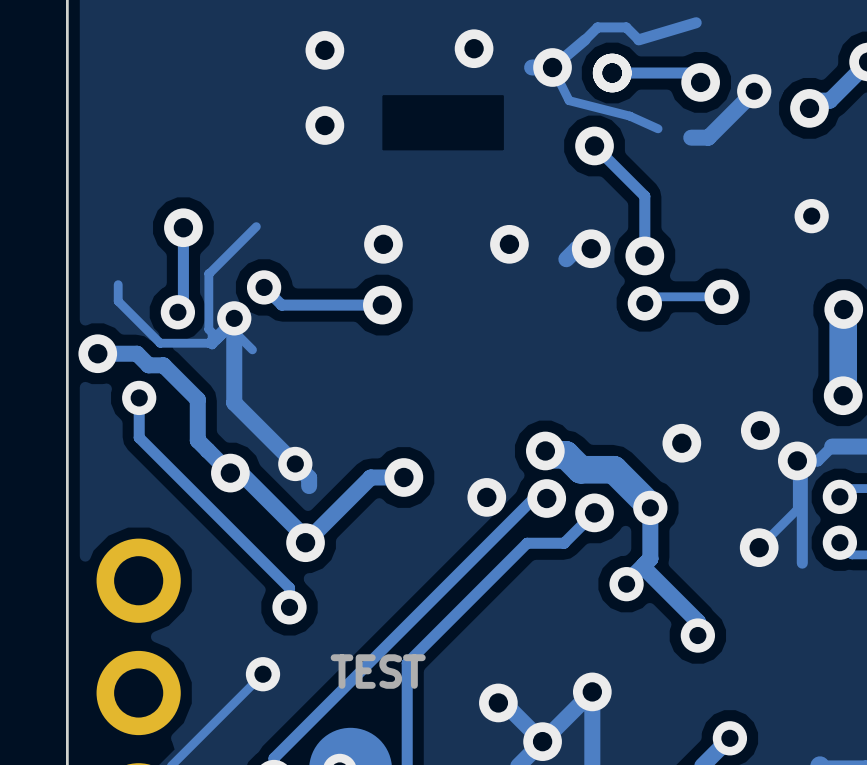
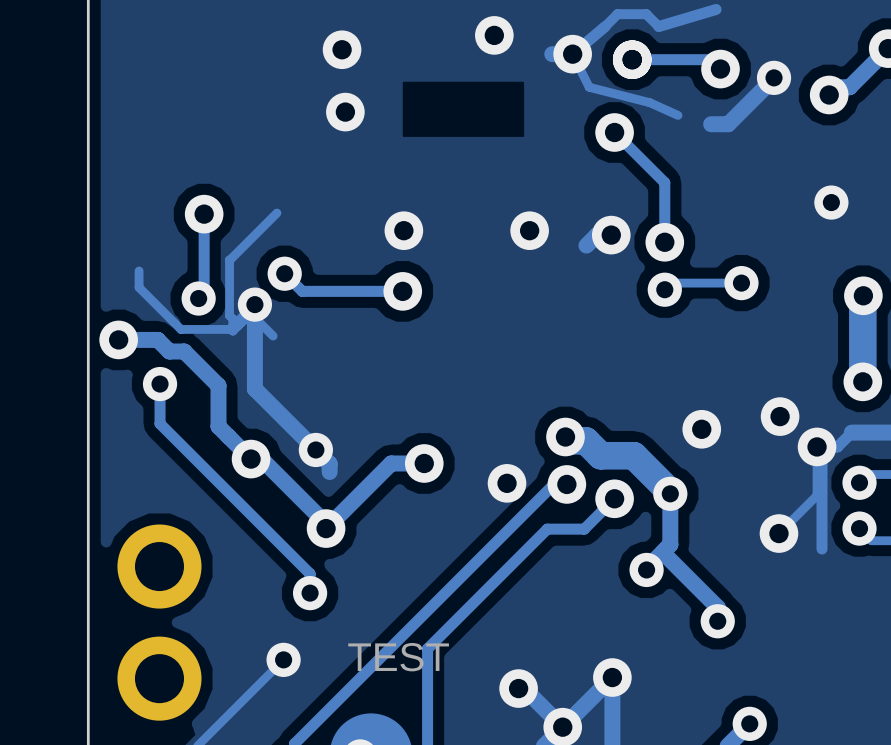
via position: (324, 50) -> (342, 49)

